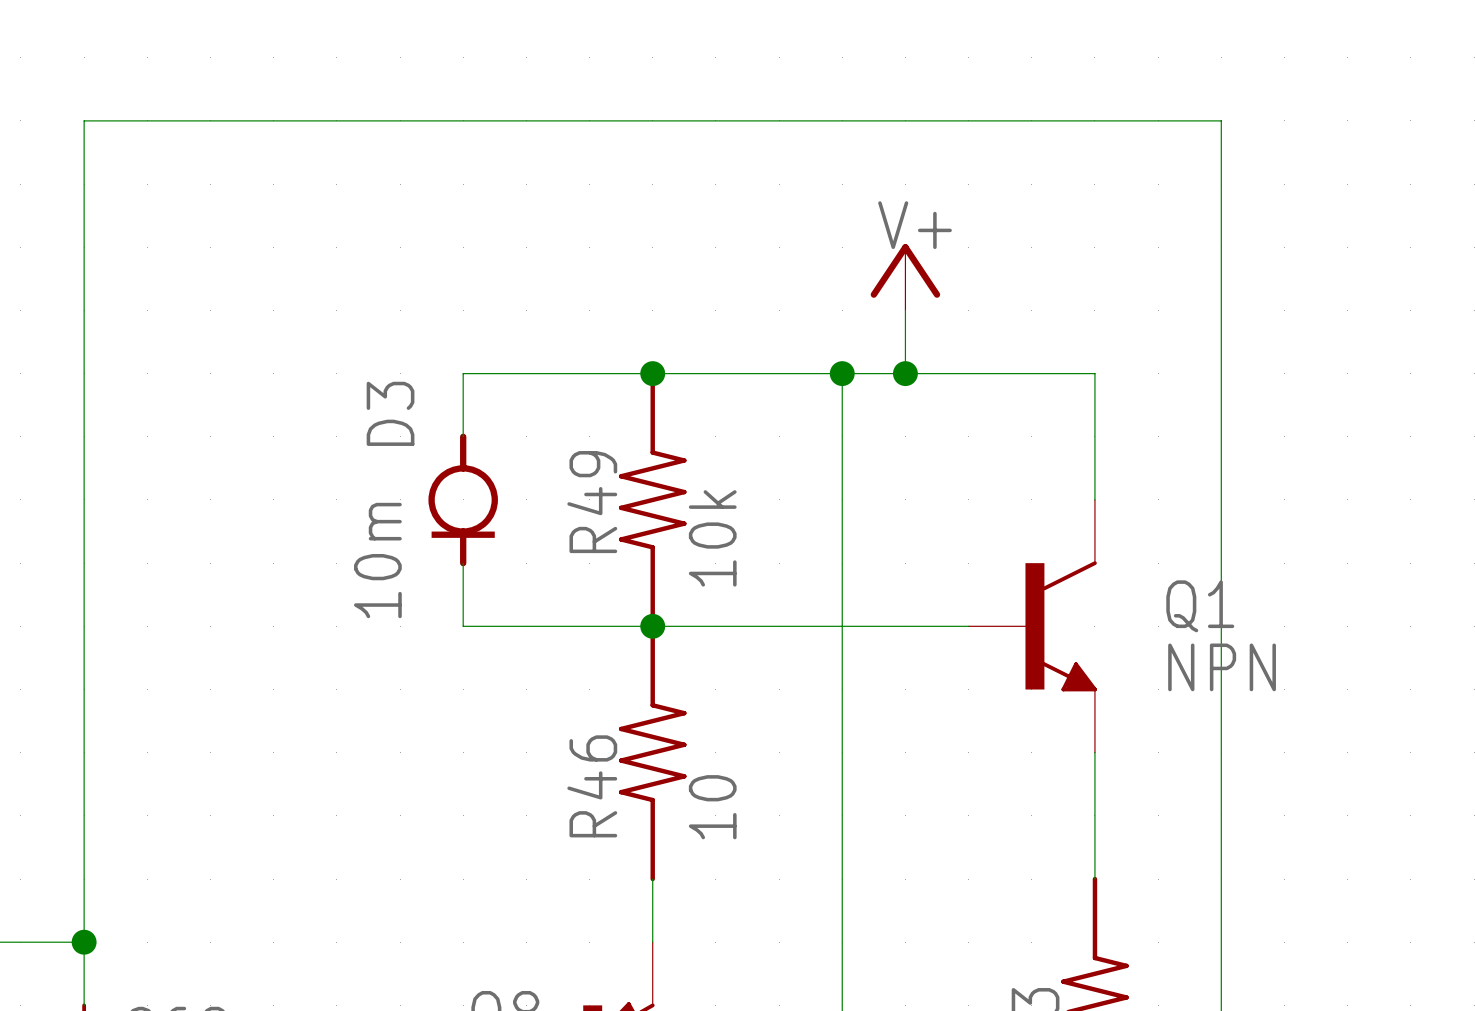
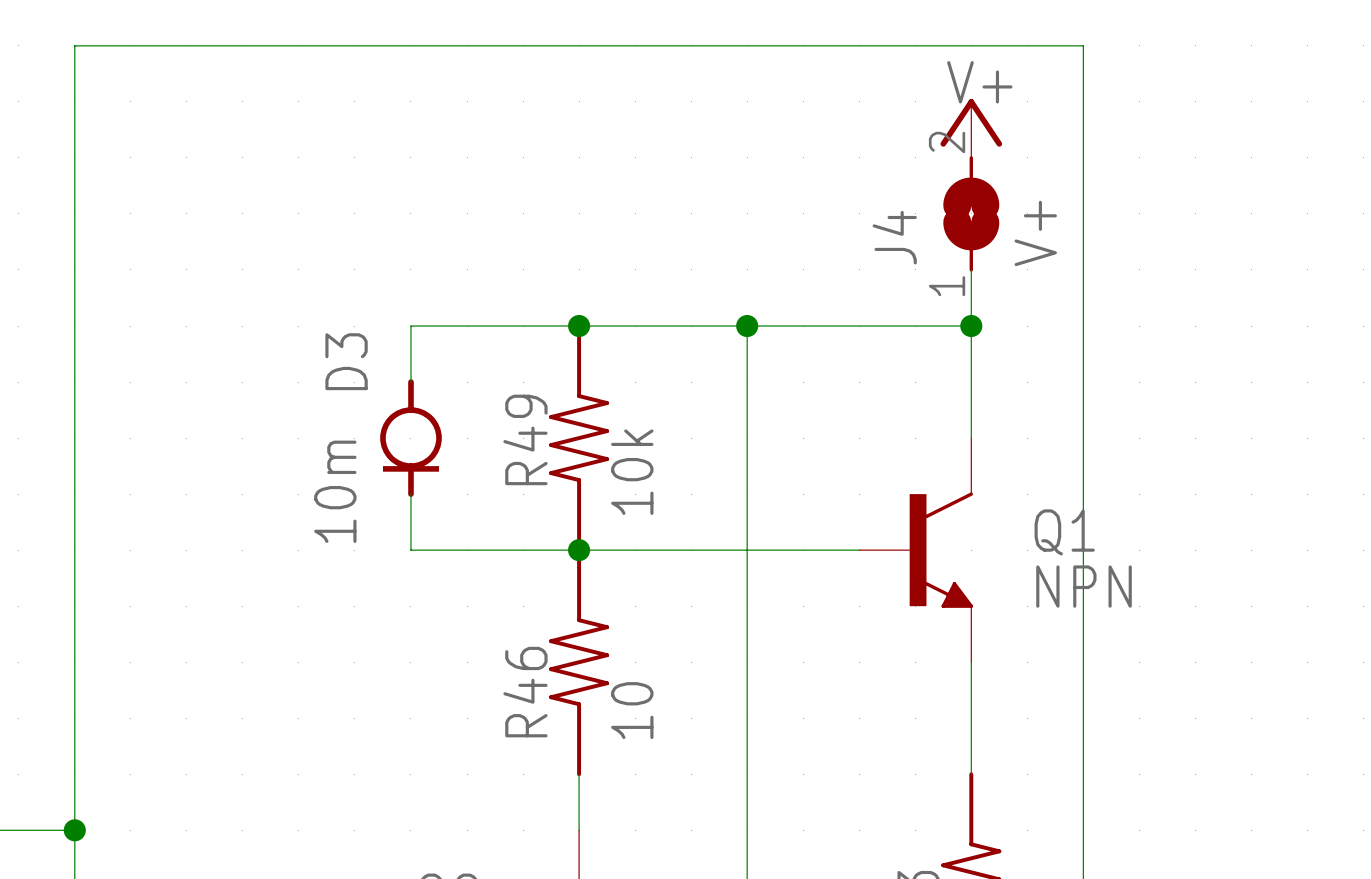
wire: (84, 120) (1221, 120) -> (74, 101) (74, 45) (1083, 45) (1083, 101)
J4: none -> V+ (971, 213)
power symbol position: V+ (905, 277) -> V+ (971, 128)
wire: (905, 310) (905, 373) -> (971, 269) (971, 326)
junction: (905, 373) -> none
junction: none -> (971, 326)

